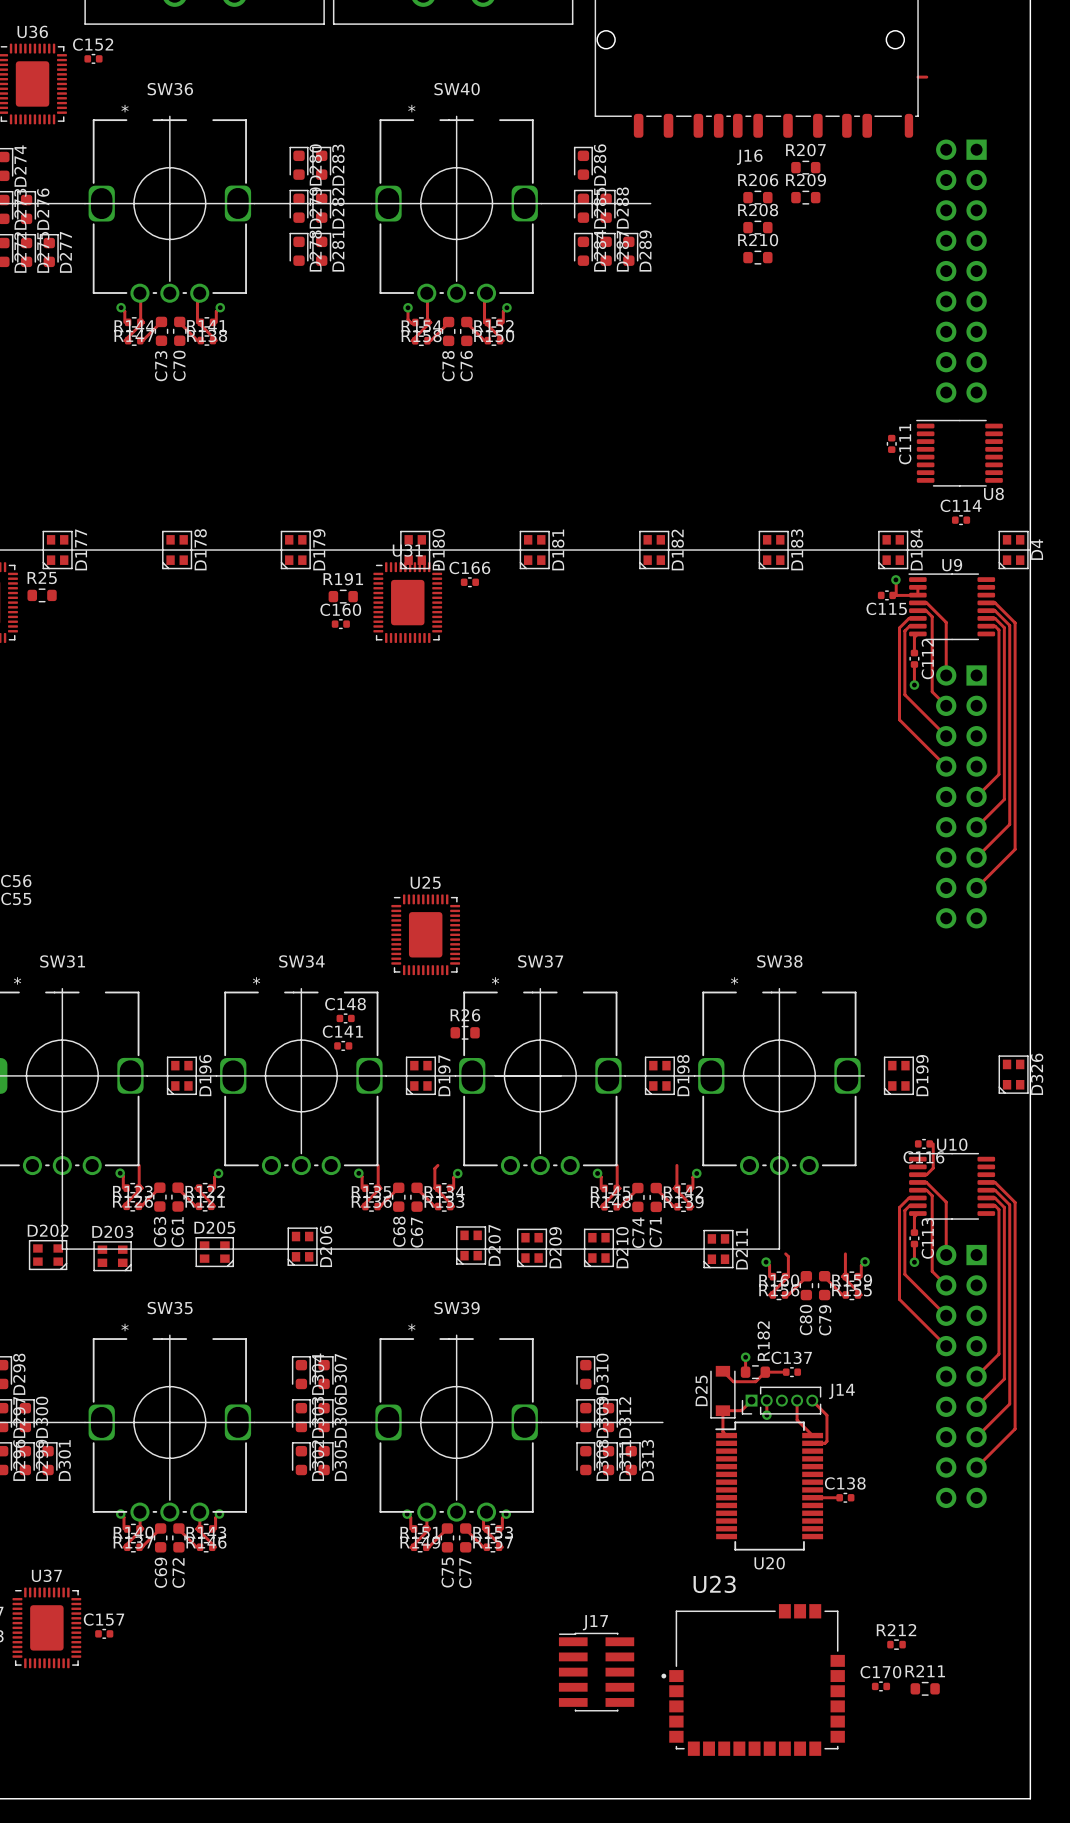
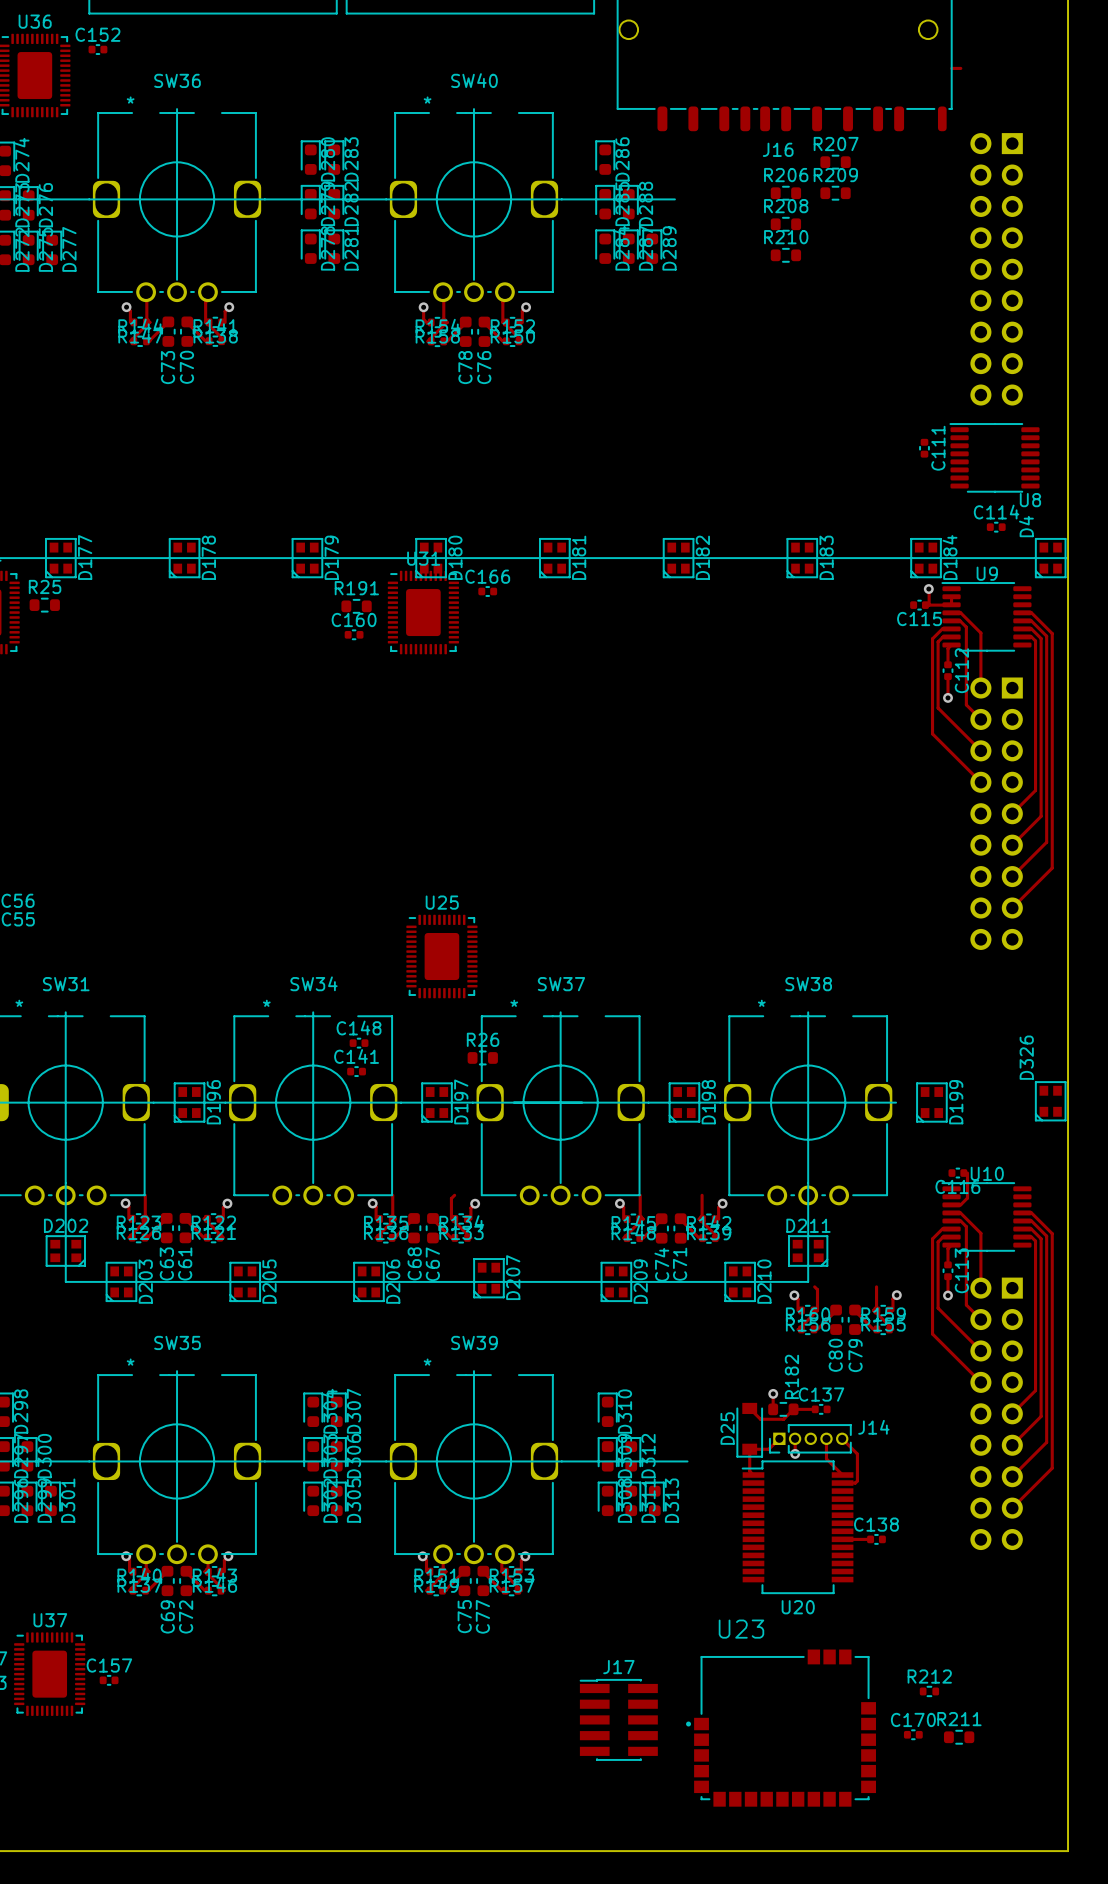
D4 name position: D4 (1037, 549) -> D4 (1026, 526)
D326 name position: D326 (1037, 1074) -> D326 (1026, 1057)
D206 position: (302, 1246) -> (368, 1281)
D209 position: (532, 1247) -> (616, 1281)
D210 position: (598, 1247) -> (740, 1281)
D211 rotation: 0° (718, 1249) -> 90° counterclockwise (808, 1250)
D211 position: (718, 1249) -> (808, 1250)
D205 rotation: 0° (214, 1252) -> 90° clockwise (245, 1281)
D202 position: (48, 1255) -> (65, 1250)
D203 rotation: 0° (112, 1256) -> 90° clockwise (121, 1281)

